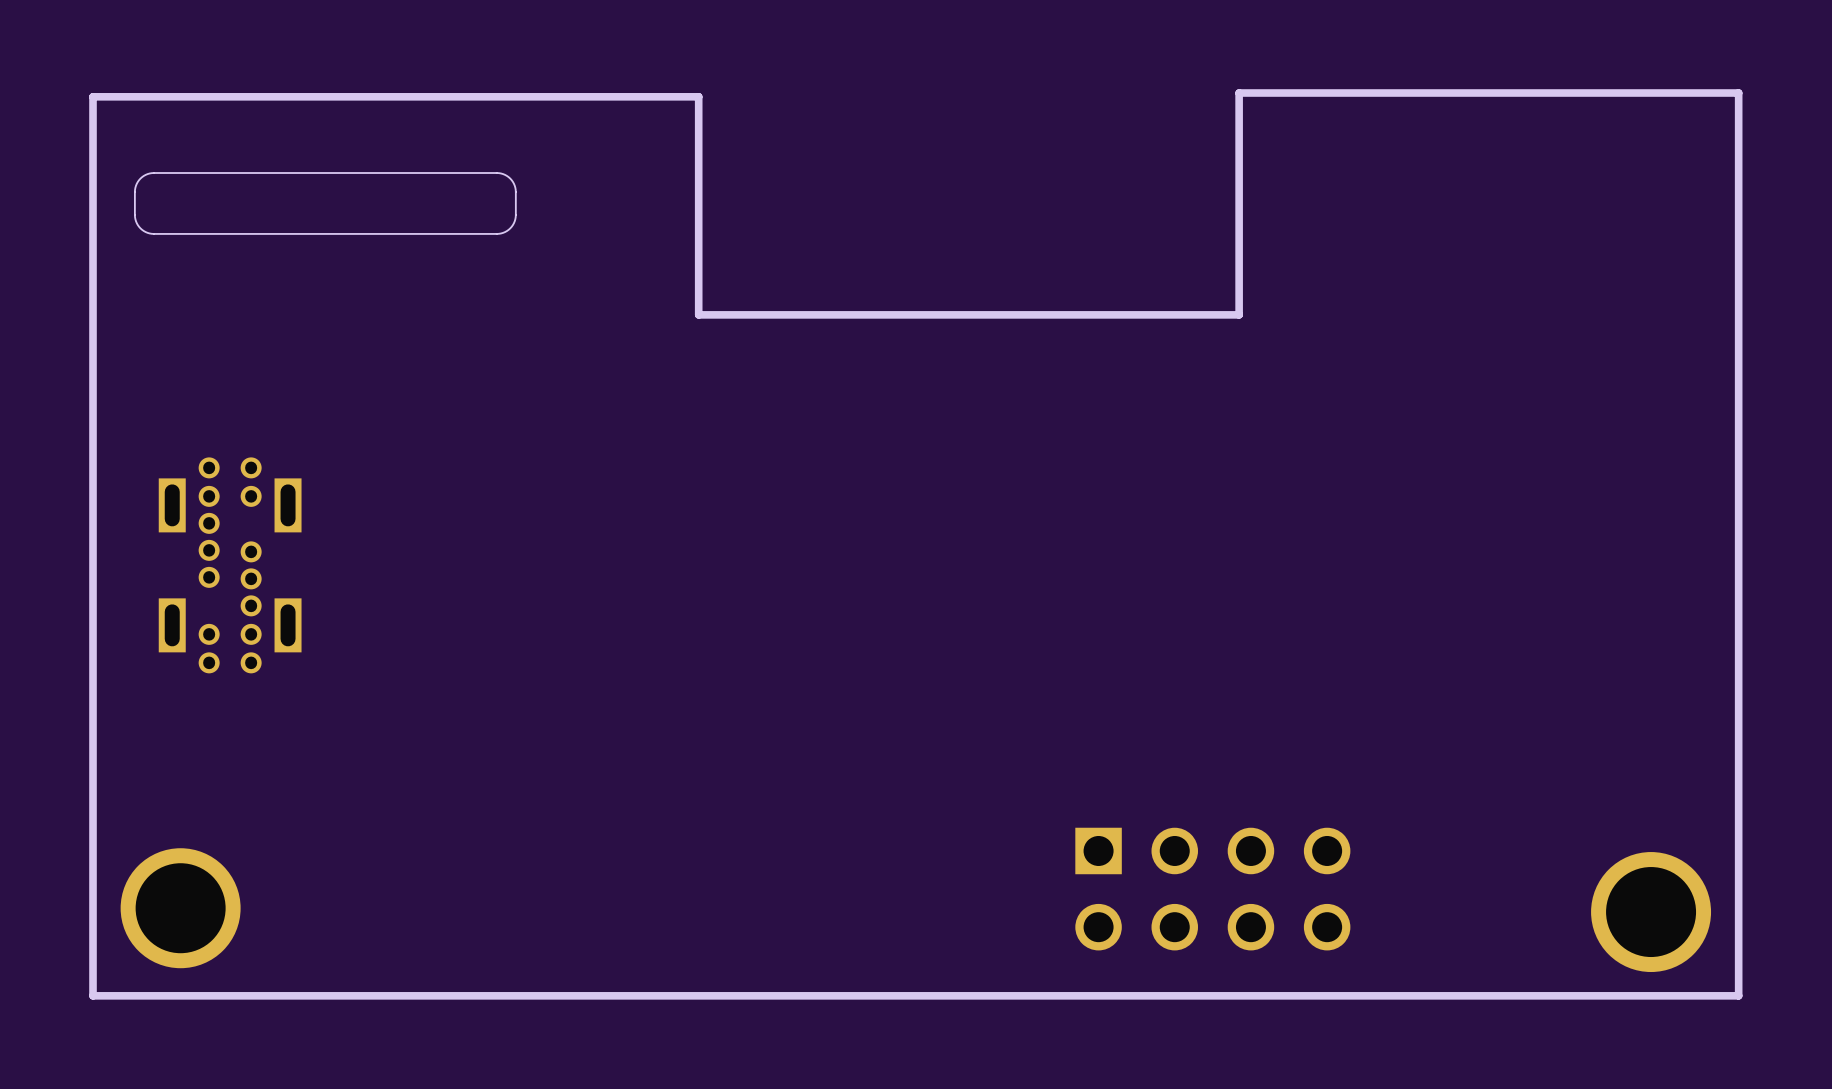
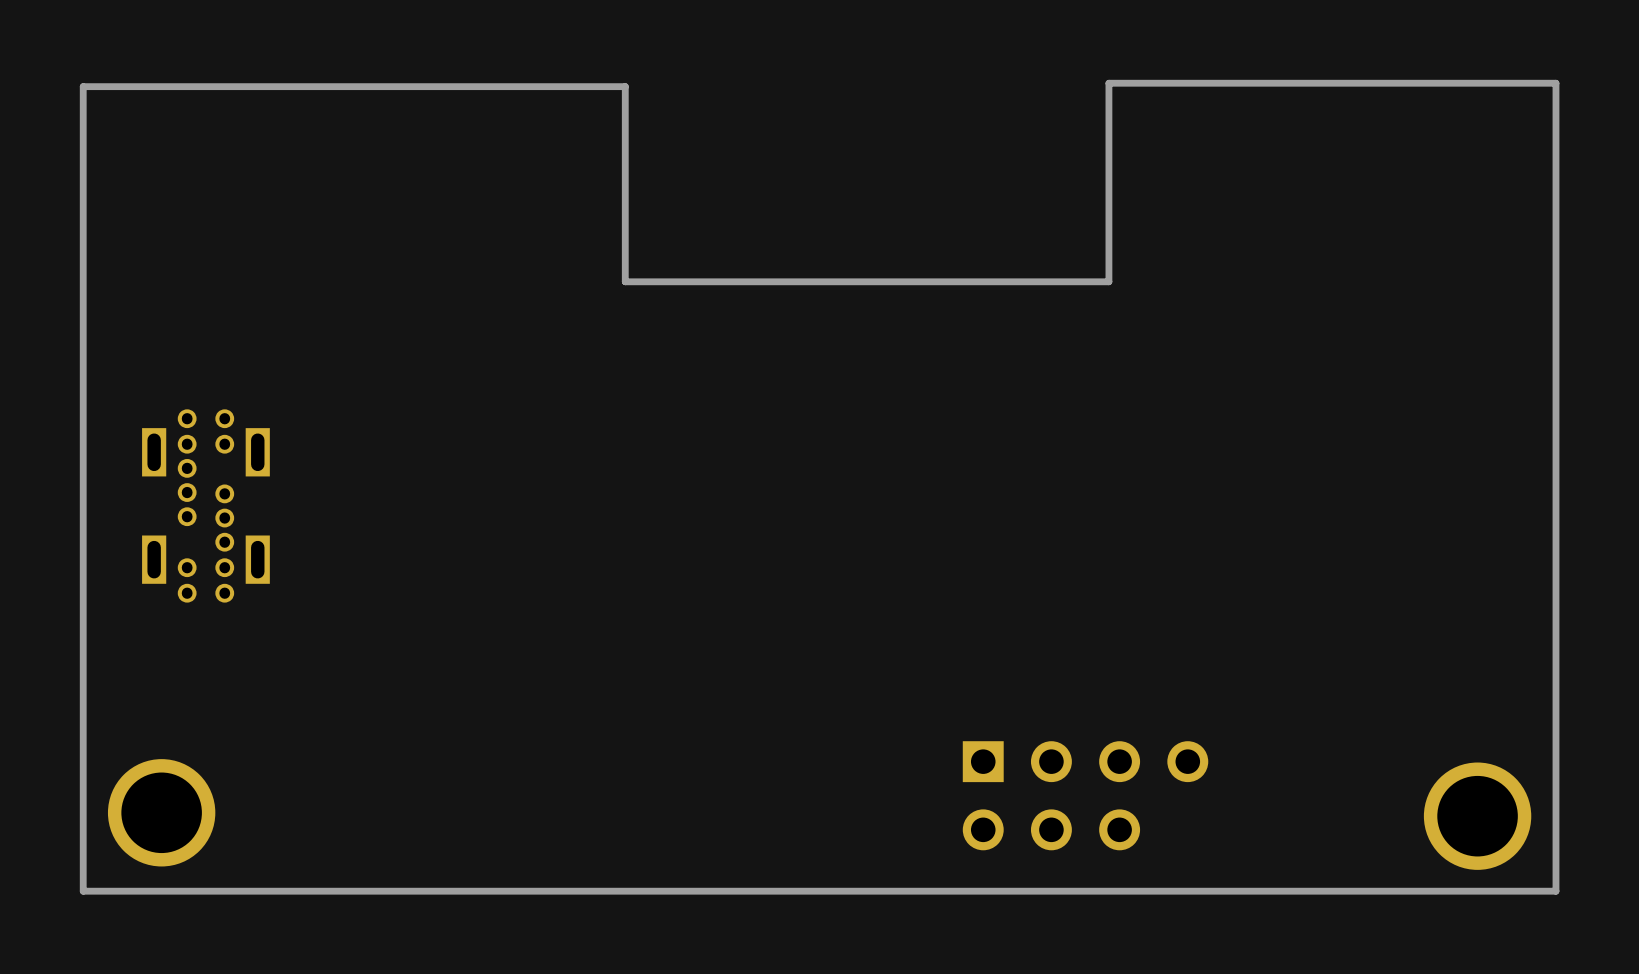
board edge: (496, 173) (151, 173) (142, 177) (135, 185) (135, 217) (140, 228) (153, 233) (498, 233) (508, 229) (514, 221) (515, 192) (510, 178) (496, 173) -> none
part: none -> (983, 761)
part: none -> (1051, 761)
part: none -> (1119, 761)
part: none -> (1187, 761)
part: (1212, 889) -> none
part: none -> (983, 829)
part: none -> (1051, 829)
part: none -> (1119, 829)

